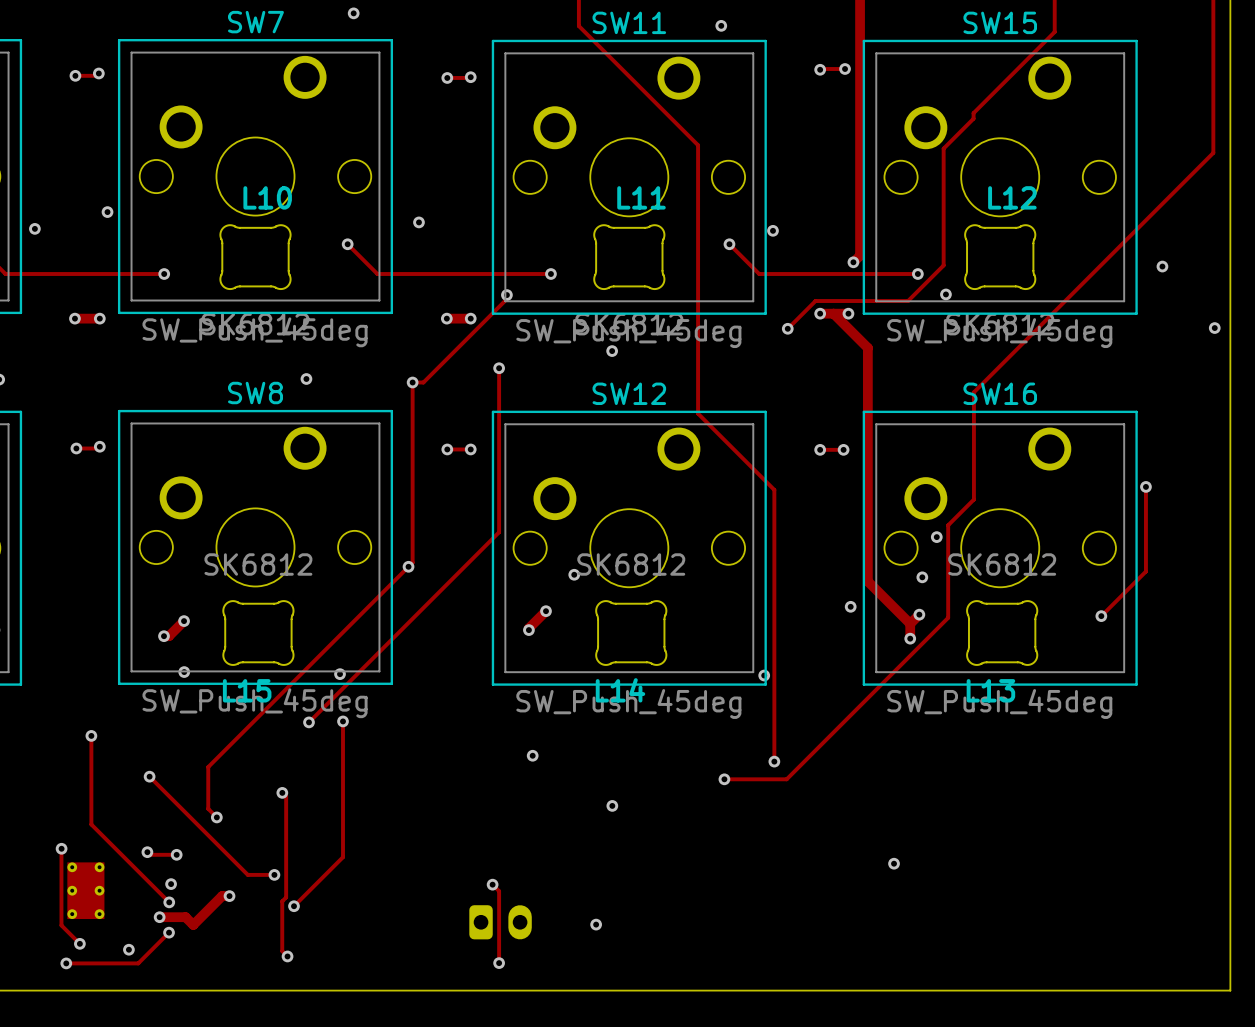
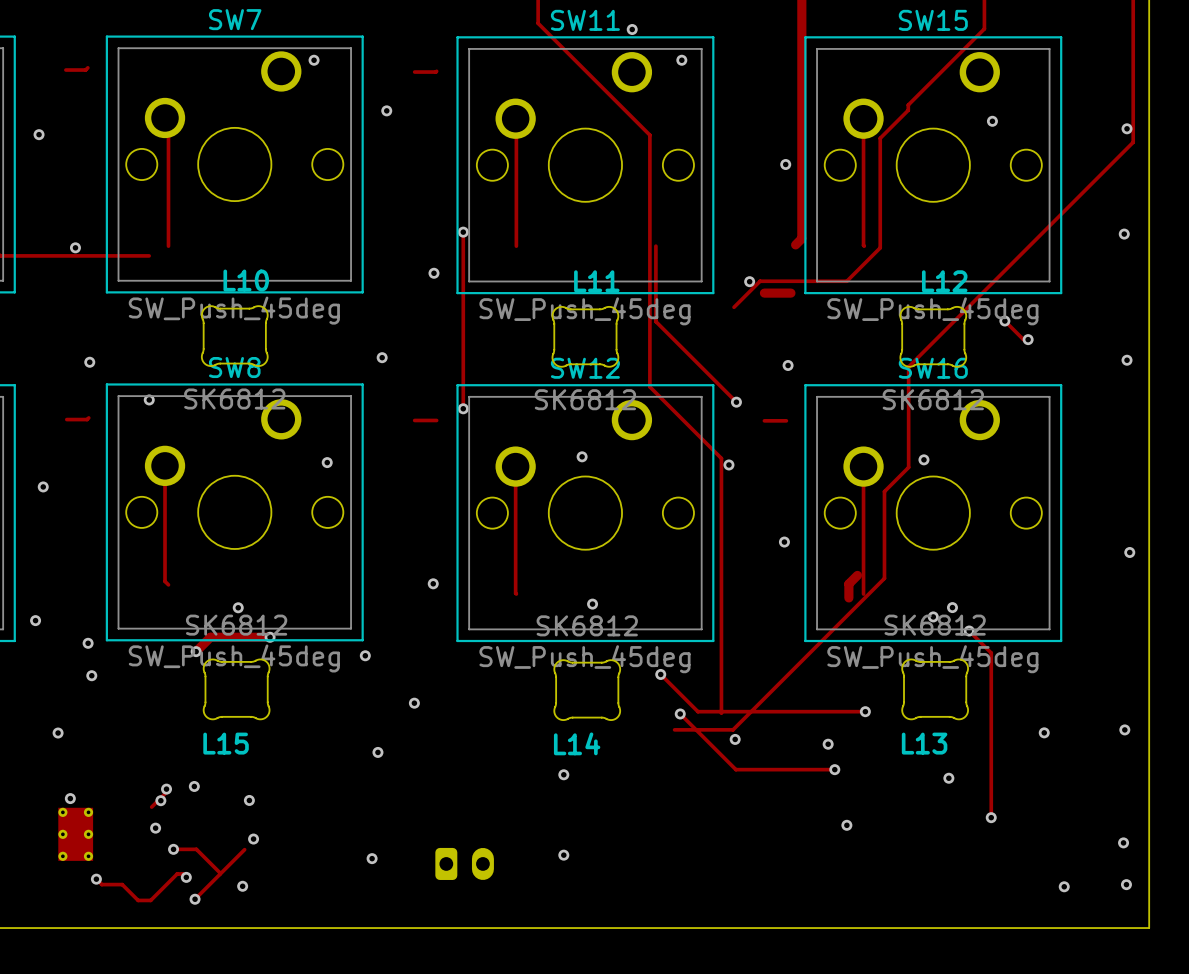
via position: (353, 13) -> (314, 60)
via: (721, 25) -> none
via: none -> (632, 29)
via: none -> (681, 60)
track: (845, 68) (820, 69) -> none
via: (845, 68) -> none
via: (820, 69) -> none
via: (98, 73) -> none
via: (75, 75) -> none
via: (447, 77) -> none
via: (470, 77) -> none
via: none -> (386, 110)
track: none -> (165, 117) (168, 121) (168, 246)
track: none -> (515, 118) (516, 246)
track: none -> (863, 118) (864, 246)
via: none -> (992, 121)
via: none -> (1127, 128)
via: none -> (39, 134)
via: none -> (785, 164)
via: (107, 212) -> none
via: (418, 222) -> none
via: (34, 228) -> none
via: (772, 230) -> none
track: (347, 244) (377, 274) (550, 274) -> none
via: (347, 244) -> none
track: (729, 244) (759, 274) (917, 274) -> none
via: (729, 244) -> none
track: none -> (463, 232) (463, 344)
via: none -> (463, 232)
via: none -> (1124, 234)
L10 position: (255, 257) -> (234, 336)
L11 position: (629, 257) -> (585, 336)
L12 position: (1000, 257) -> (933, 336)
via: (853, 262) -> none
track: none -> (655, 246) (655, 321) (736, 402)
via: none -> (75, 247)
via: (1162, 266) -> none
via: (164, 274) -> none
via: (550, 274) -> none
via: (917, 274) -> none
via: none -> (433, 273)
via: (945, 294) -> none
track: (506, 295) (506, 299) (423, 382) (412, 382) (412, 562) (208, 767) (208, 808) (216, 817) -> none
via: (506, 295) -> none
via: none -> (749, 281)
via: (820, 313) -> none
track: (833, 313) (867, 347) (867, 581) (910, 623) -> none
via: (848, 313) -> none
track: (74, 318) (99, 318) -> none
via: (74, 318) -> none
via: (99, 318) -> none
track: (446, 318) (470, 318) -> none
via: (446, 318) -> none
via: (470, 318) -> none
via: (787, 328) -> none
via: (1214, 328) -> none
track: none -> (1004, 321) (1023, 339) (1028, 339)
via: none -> (1004, 321)
via: (612, 351) -> none
via: none -> (1028, 339)
via: (499, 368) -> none
via: (306, 378) -> none
via: none -> (1127, 360)
via: none -> (89, 362)
via: none -> (788, 365)
via: none -> (149, 399)
via: none -> (736, 402)
track: (499, 436) (499, 532) (308, 722) -> none
via: none -> (463, 408)
via: (99, 446) -> none
via: (76, 448) -> none
via: (447, 449) -> none
via: (470, 449) -> none
via: (820, 449) -> none
via: (843, 449) -> none
track: (1145, 486) (1145, 571) (1101, 616) -> none
via: (1145, 486) -> none
via: none -> (582, 456)
via: none -> (923, 459)
via: none -> (327, 462)
via: none -> (728, 464)
track: none -> (165, 465) (165, 581) (168, 584)
track: none -> (515, 466) (516, 594)
track: none -> (863, 466) (863, 594)
via: none -> (43, 486)
via: (936, 537) -> none
via: (408, 566) -> none
via: (574, 574) -> none
via: (922, 577) -> none
via: none -> (1129, 552)
via position: (850, 606) -> (784, 542)
track: (546, 611) (528, 630) -> none
via: (546, 611) -> none
via: (919, 614) -> none
via: (1101, 616) -> none
track: (184, 621) (168, 636) (163, 636) -> none
via: (184, 621) -> none
via: none -> (433, 583)
via: (528, 630) -> none
L15 position: (258, 633) -> (236, 689)
L14 position: (631, 633) -> (587, 690)
L13 position: (1002, 633) -> (935, 689)
via: (163, 636) -> none
via: (910, 638) -> none
via: none -> (592, 604)
via: none -> (952, 607)
via: none -> (238, 607)
via: none -> (933, 616)
via: none -> (35, 620)
via position: (184, 672) -> (196, 651)
track: none -> (969, 631) (991, 653) (991, 817)
via: none -> (969, 631)
via: (340, 674) -> none
via: (764, 675) -> none
track: none -> (270, 637) (210, 637) (196, 651)
via: none -> (270, 637)
via: none -> (88, 643)
via: none -> (365, 655)
track: none -> (660, 674) (697, 711) (865, 711)
via: none -> (660, 674)
track: (343, 721) (343, 857) (294, 906) -> none
via: (343, 721) -> none
via: (308, 722) -> none
track: (91, 735) (91, 824) (169, 902) -> none
via position: (91, 735) -> (91, 675)
via: none -> (414, 703)
via: (532, 755) -> none
via: none -> (865, 711)
via: (774, 761) -> none
track: none -> (680, 713) (735, 769) (834, 769)
track: (149, 776) (247, 874) (274, 874) -> none
via: (149, 776) -> none
via position: (724, 779) -> (680, 713)
via: none -> (1124, 729)
via: none -> (58, 733)
via: none -> (1044, 732)
via: none -> (735, 739)
track: (282, 792) (286, 796) (286, 897) (282, 901) (282, 951) (287, 956) -> none
via: (282, 792) -> none
via: none -> (828, 744)
via: none -> (377, 752)
via position: (612, 805) -> (563, 774)
via: (216, 817) -> none
via: none -> (834, 769)
via: none -> (948, 778)
via: none -> (194, 786)
track: none -> (166, 789) (166, 792) (151, 807)
via: none -> (166, 789)
track: (61, 848) (61, 925) (79, 943) -> none
via position: (61, 848) -> (70, 798)
track: (147, 852) (150, 854) (176, 854) -> none
via: (147, 852) -> none
via: none -> (249, 800)
via: (894, 863) -> none
via: none -> (991, 817)
via: (274, 874) -> none
via: none -> (846, 825)
track: (492, 884) (499, 891) (499, 963) -> none
via: (492, 884) -> none
via: none -> (253, 839)
track: (229, 896) (222, 896) (193, 924) (185, 917) (159, 917) -> none
via: (229, 896) -> none
via: none -> (1123, 842)
via: (169, 902) -> none
track: none -> (173, 849) (196, 849) (219, 874)
via: none -> (173, 849)
via: (294, 906) -> none
track: none -> (244, 849) (195, 899)
via: none -> (372, 858)
via: (159, 917) -> none
via position: (596, 924) -> (563, 855)
track: (169, 932) (138, 963) (66, 963) -> none
via: (169, 932) -> none
track: none -> (186, 877) (182, 874) (177, 874) (150, 900) (138, 900) (122, 884) (101, 884) (96, 879)
via: none -> (186, 877)
via: none -> (96, 879)
via: (79, 943) -> none
via: none -> (1126, 884)
via: none -> (242, 886)
via: none -> (1064, 886)
via: (128, 949) -> none
via: (287, 956) -> none
via: none -> (195, 899)
via: (66, 963) -> none
via: (499, 963) -> none

